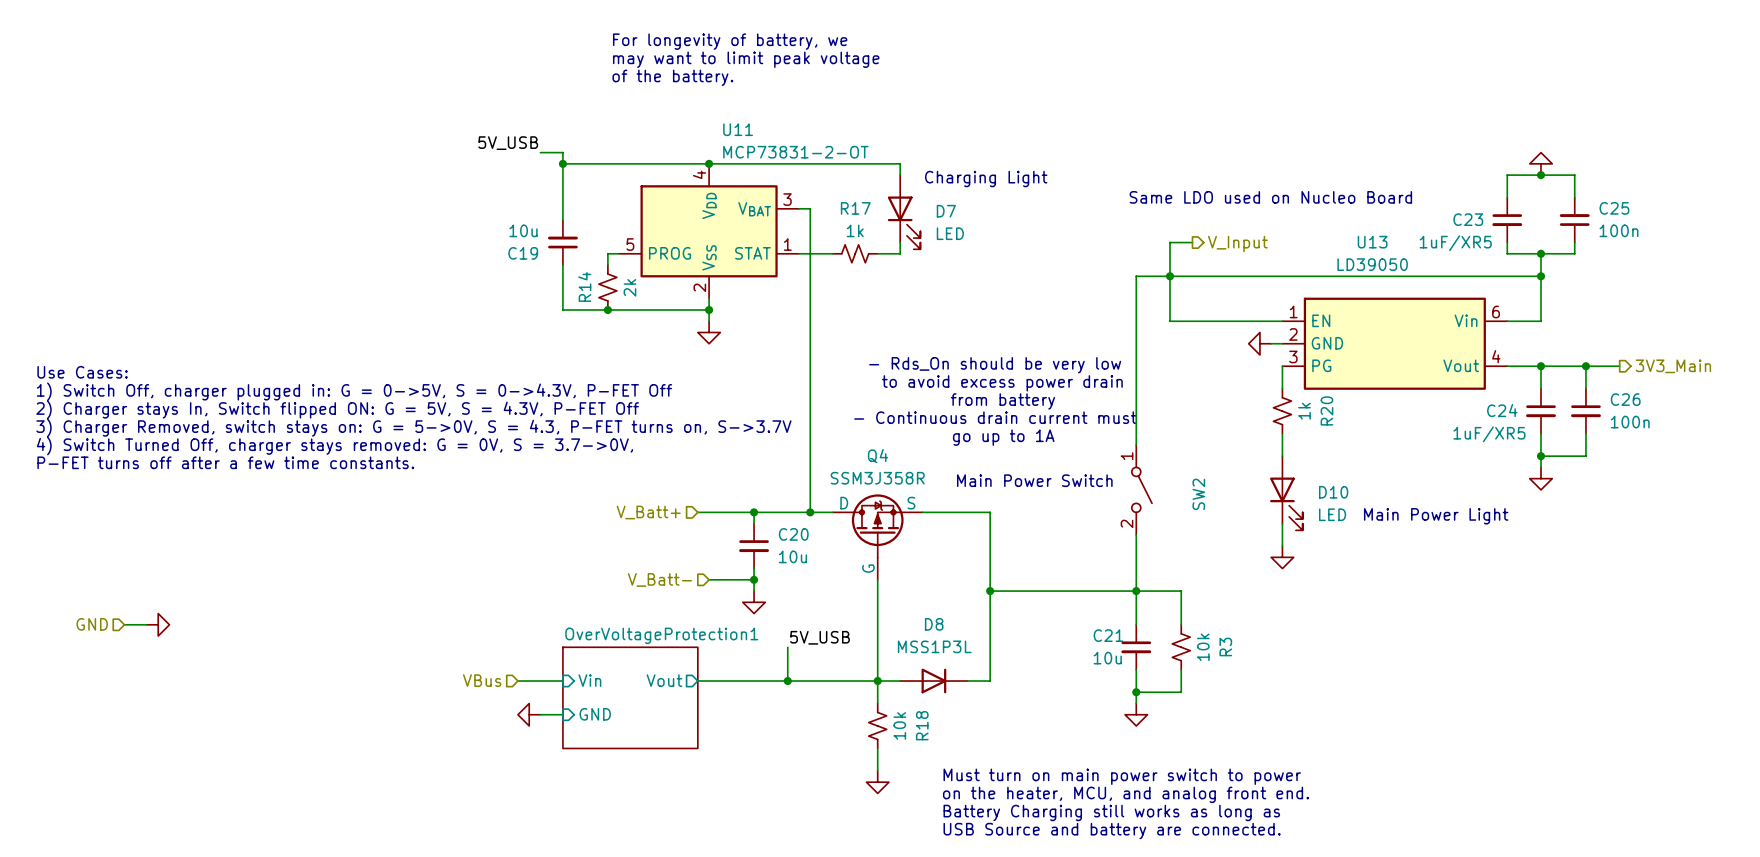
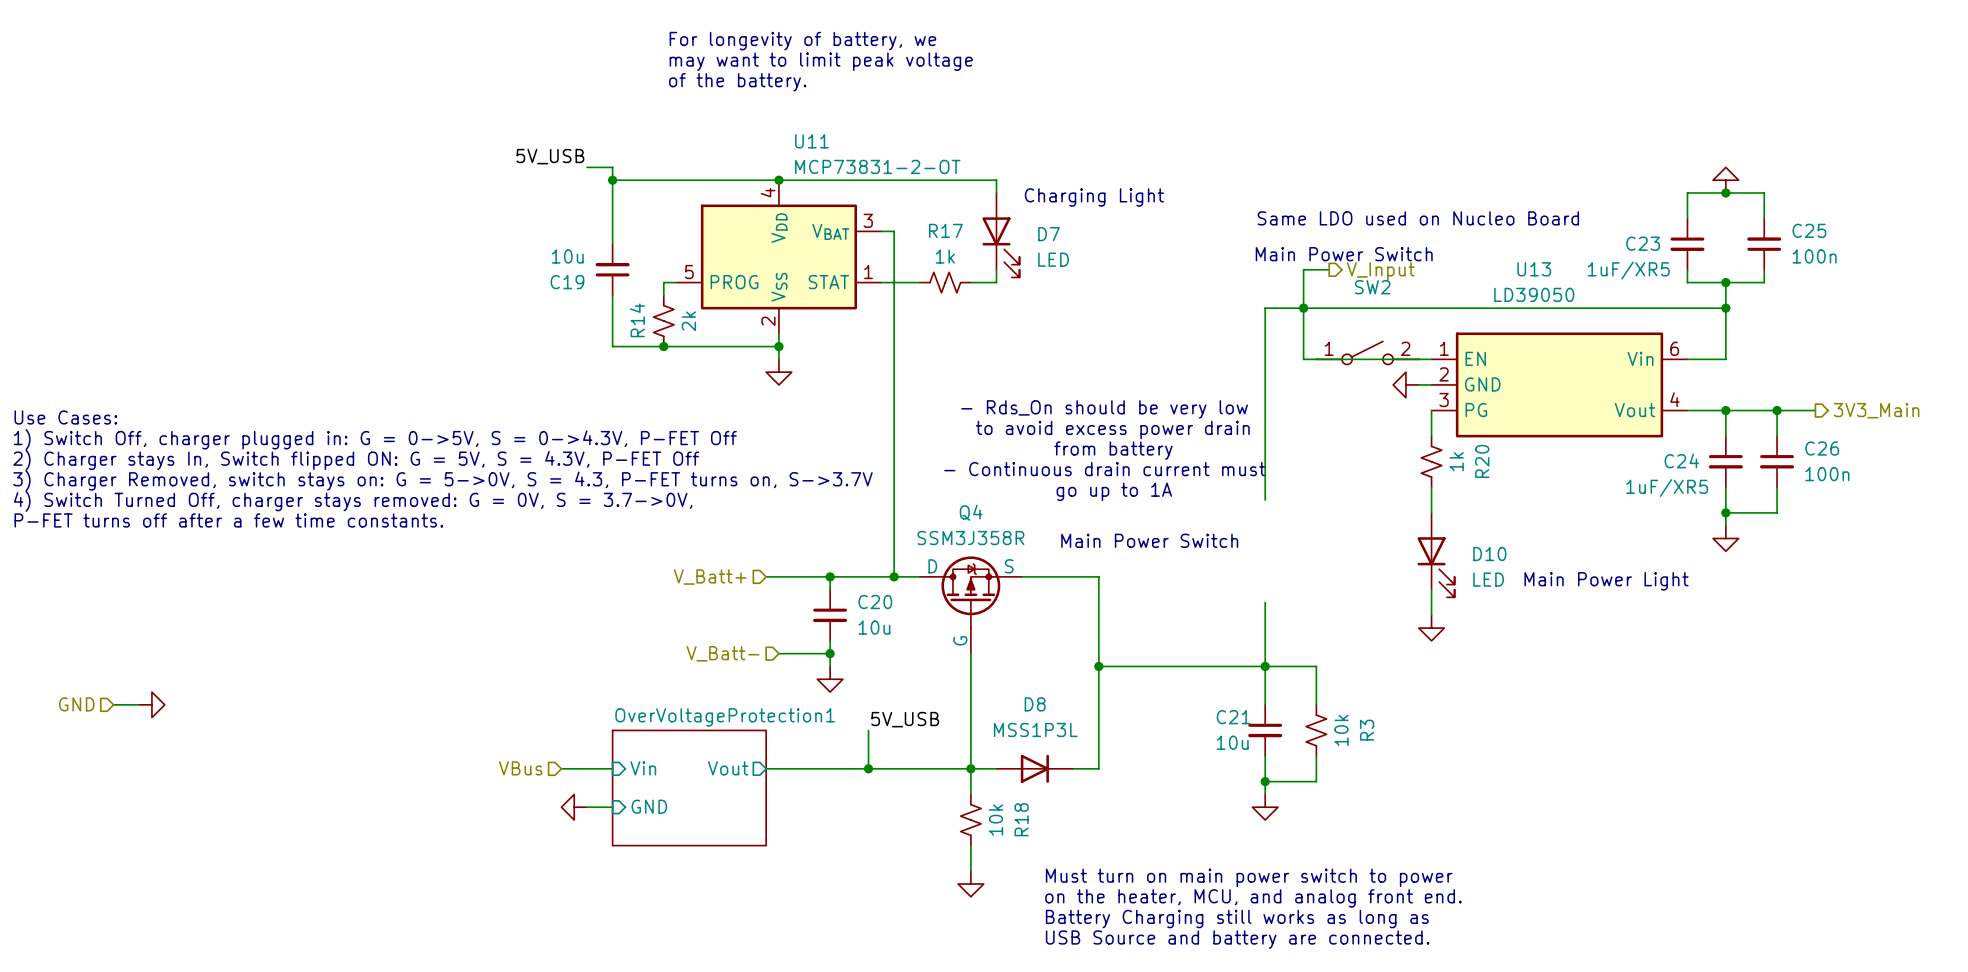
text: none -> Main Power Switch (1344, 254)
SW2 rotation: 0° (1141, 489) -> 90° counterclockwise (1367, 352)
SW2 position: (1141, 489) -> (1367, 352)

